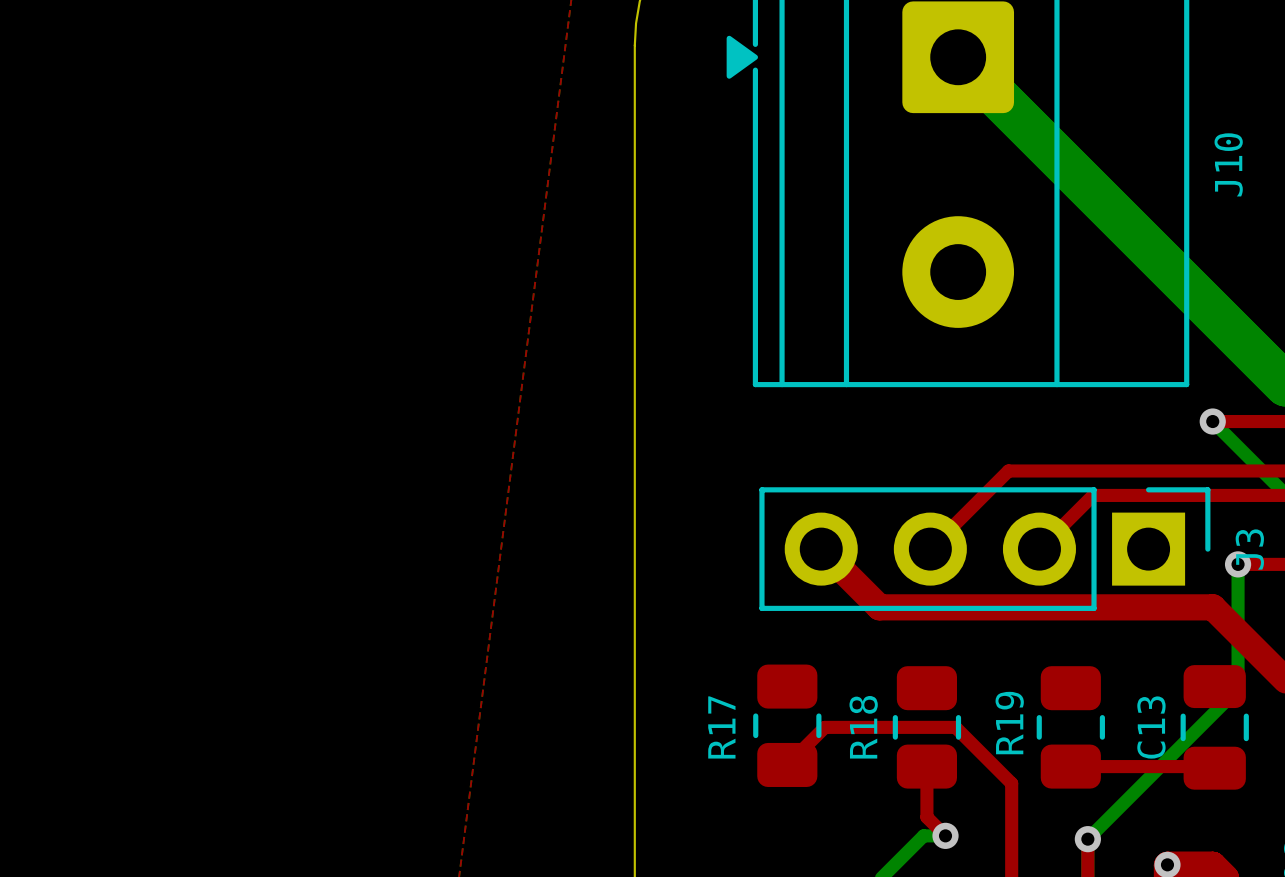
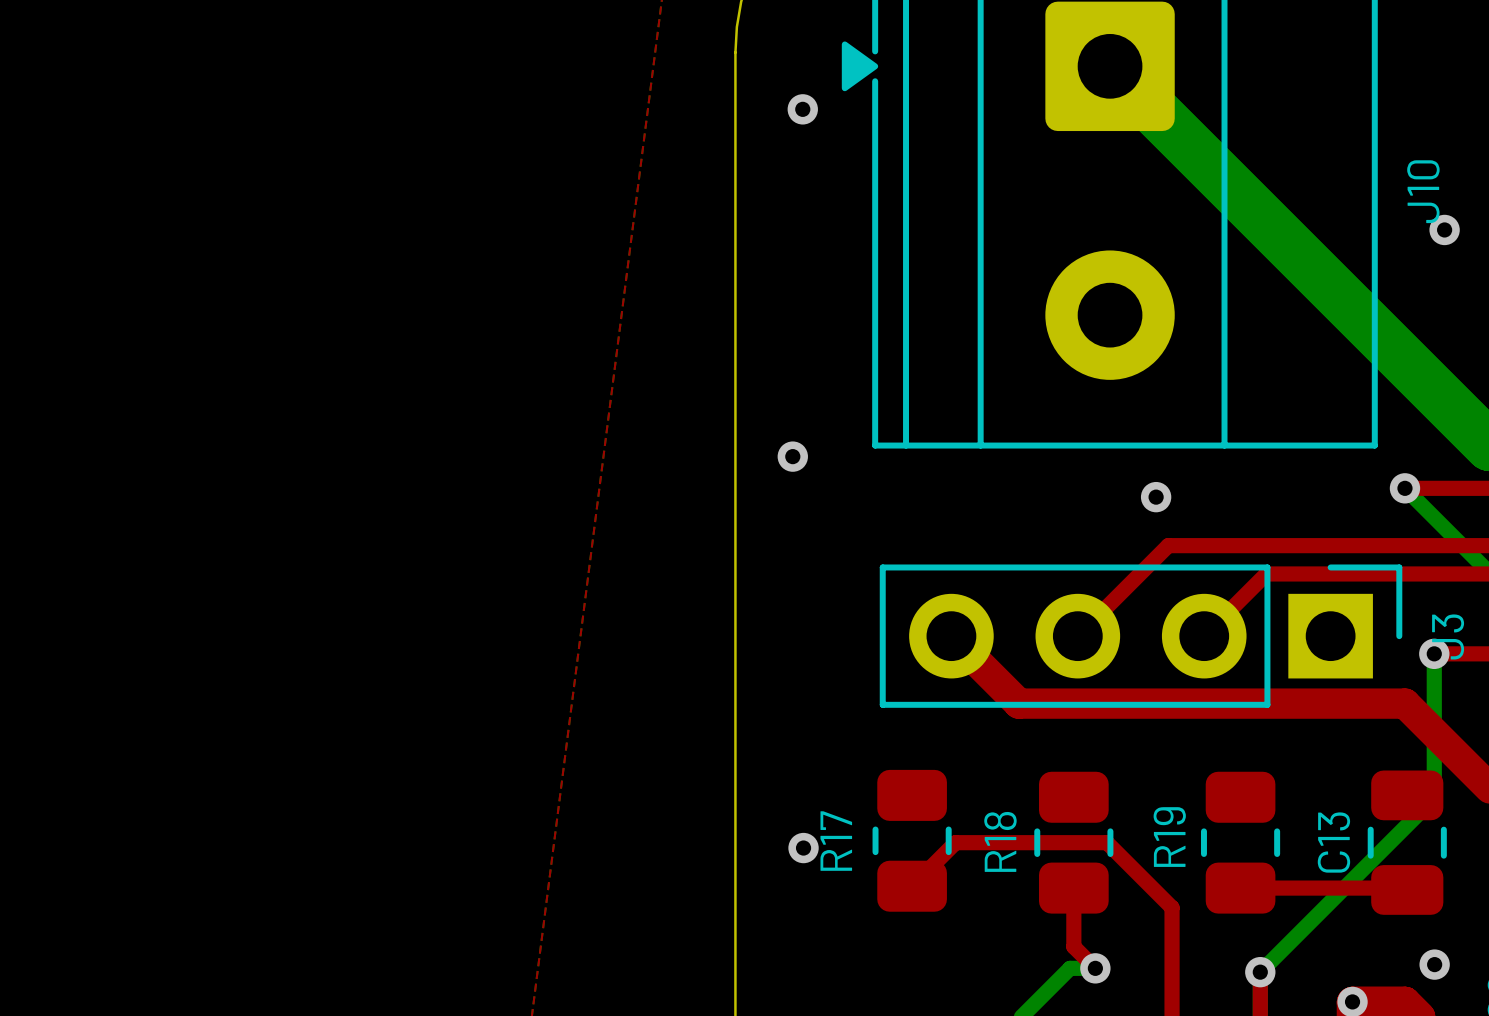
via: none -> (802, 109)
via: none -> (1444, 229)
via: none -> (792, 456)
via: none -> (1156, 497)
via: none -> (803, 848)
via: none -> (1434, 964)

